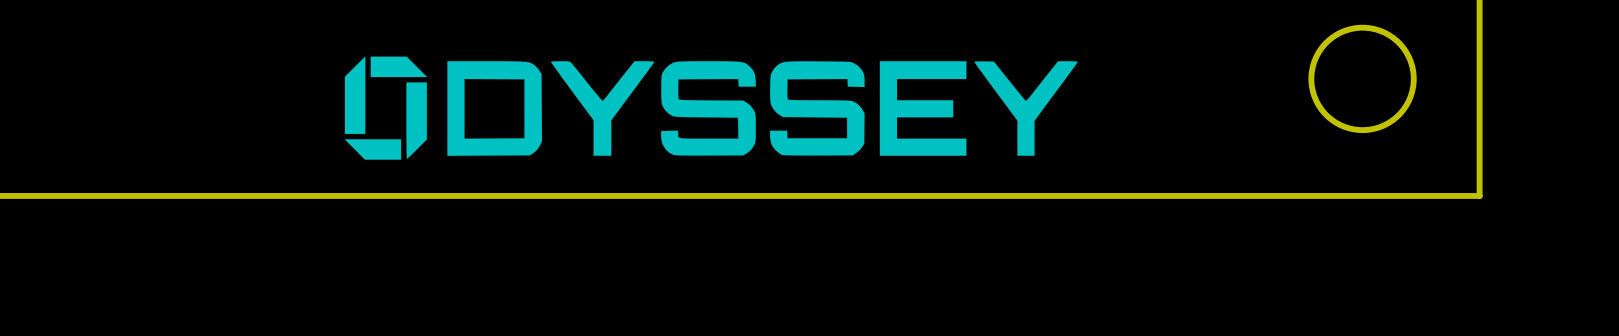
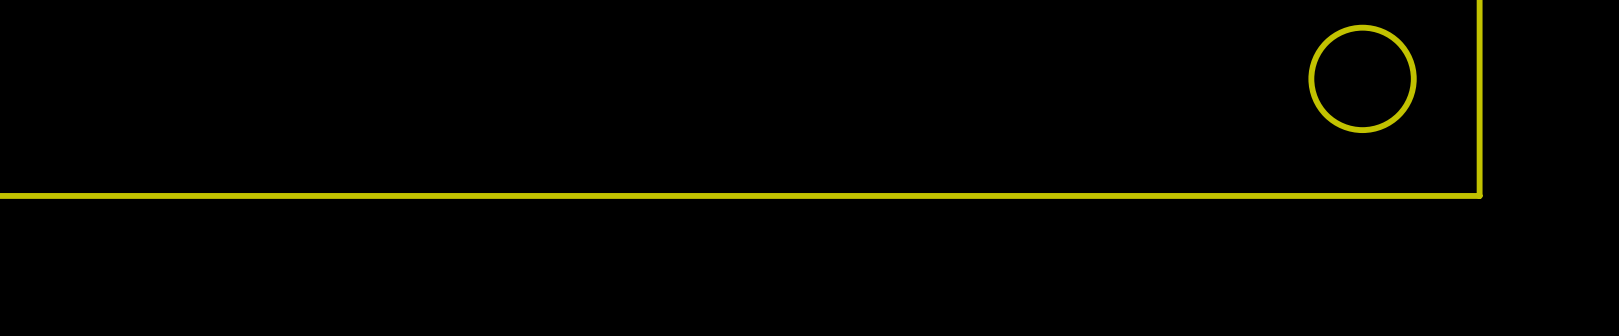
drawing: [344, 56, 1078, 160] -> none

